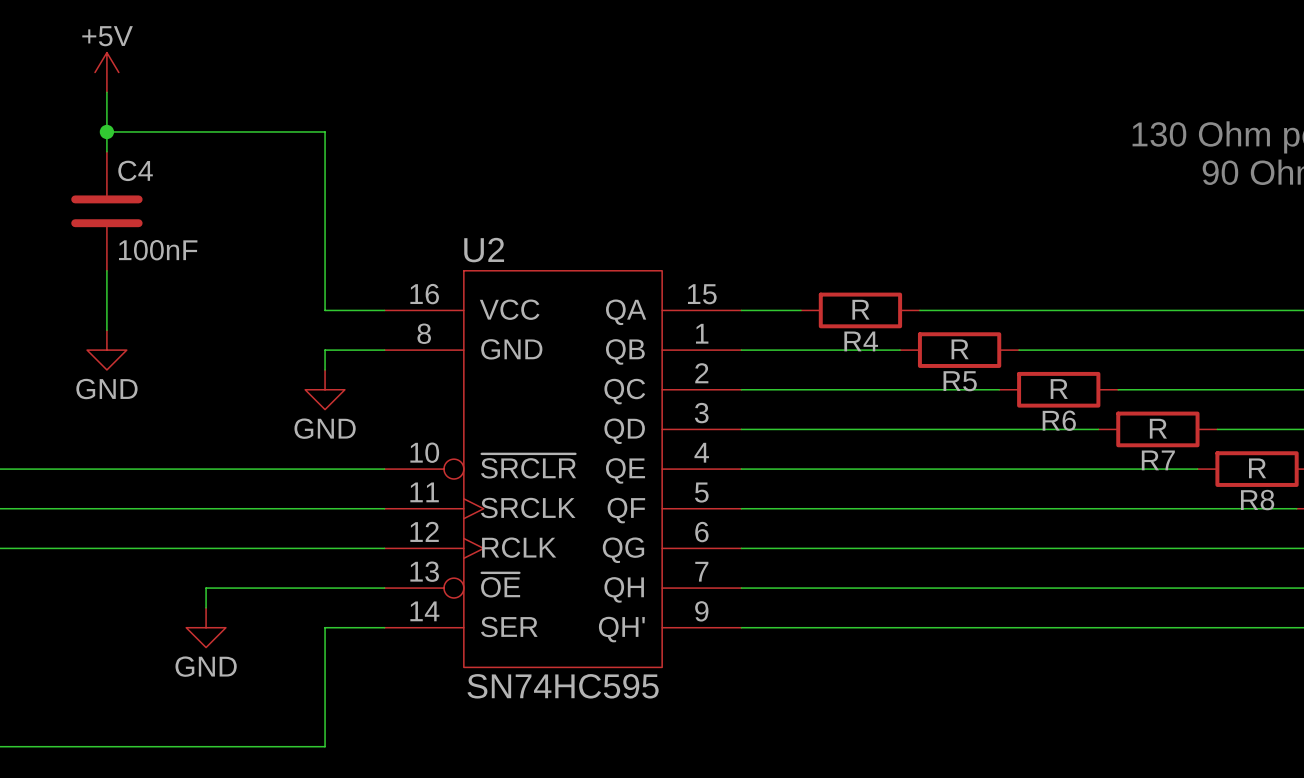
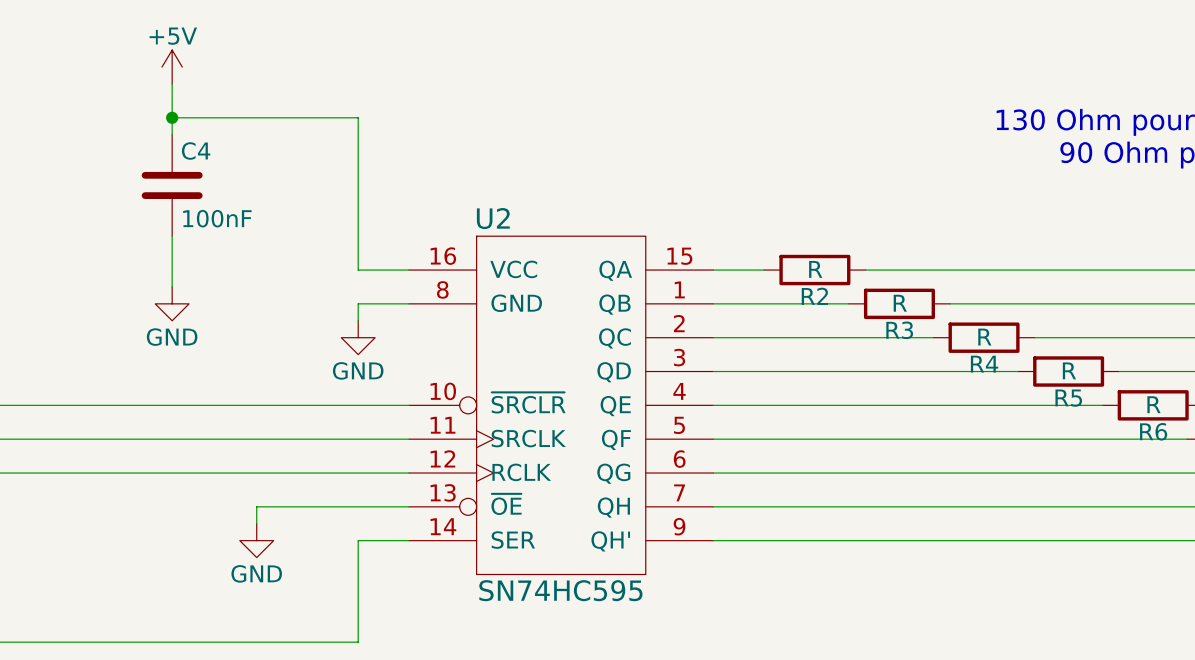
R4 name: R4 (861, 341) -> R2 (814, 296)
R5 name: R5 (960, 381) -> R3 (899, 330)
R6 name: R6 (1059, 420) -> R4 (984, 364)
R7 name: R7 (1158, 460) -> R5 (1068, 398)
R8 name: R8 (1257, 500) -> R6 (1153, 431)

